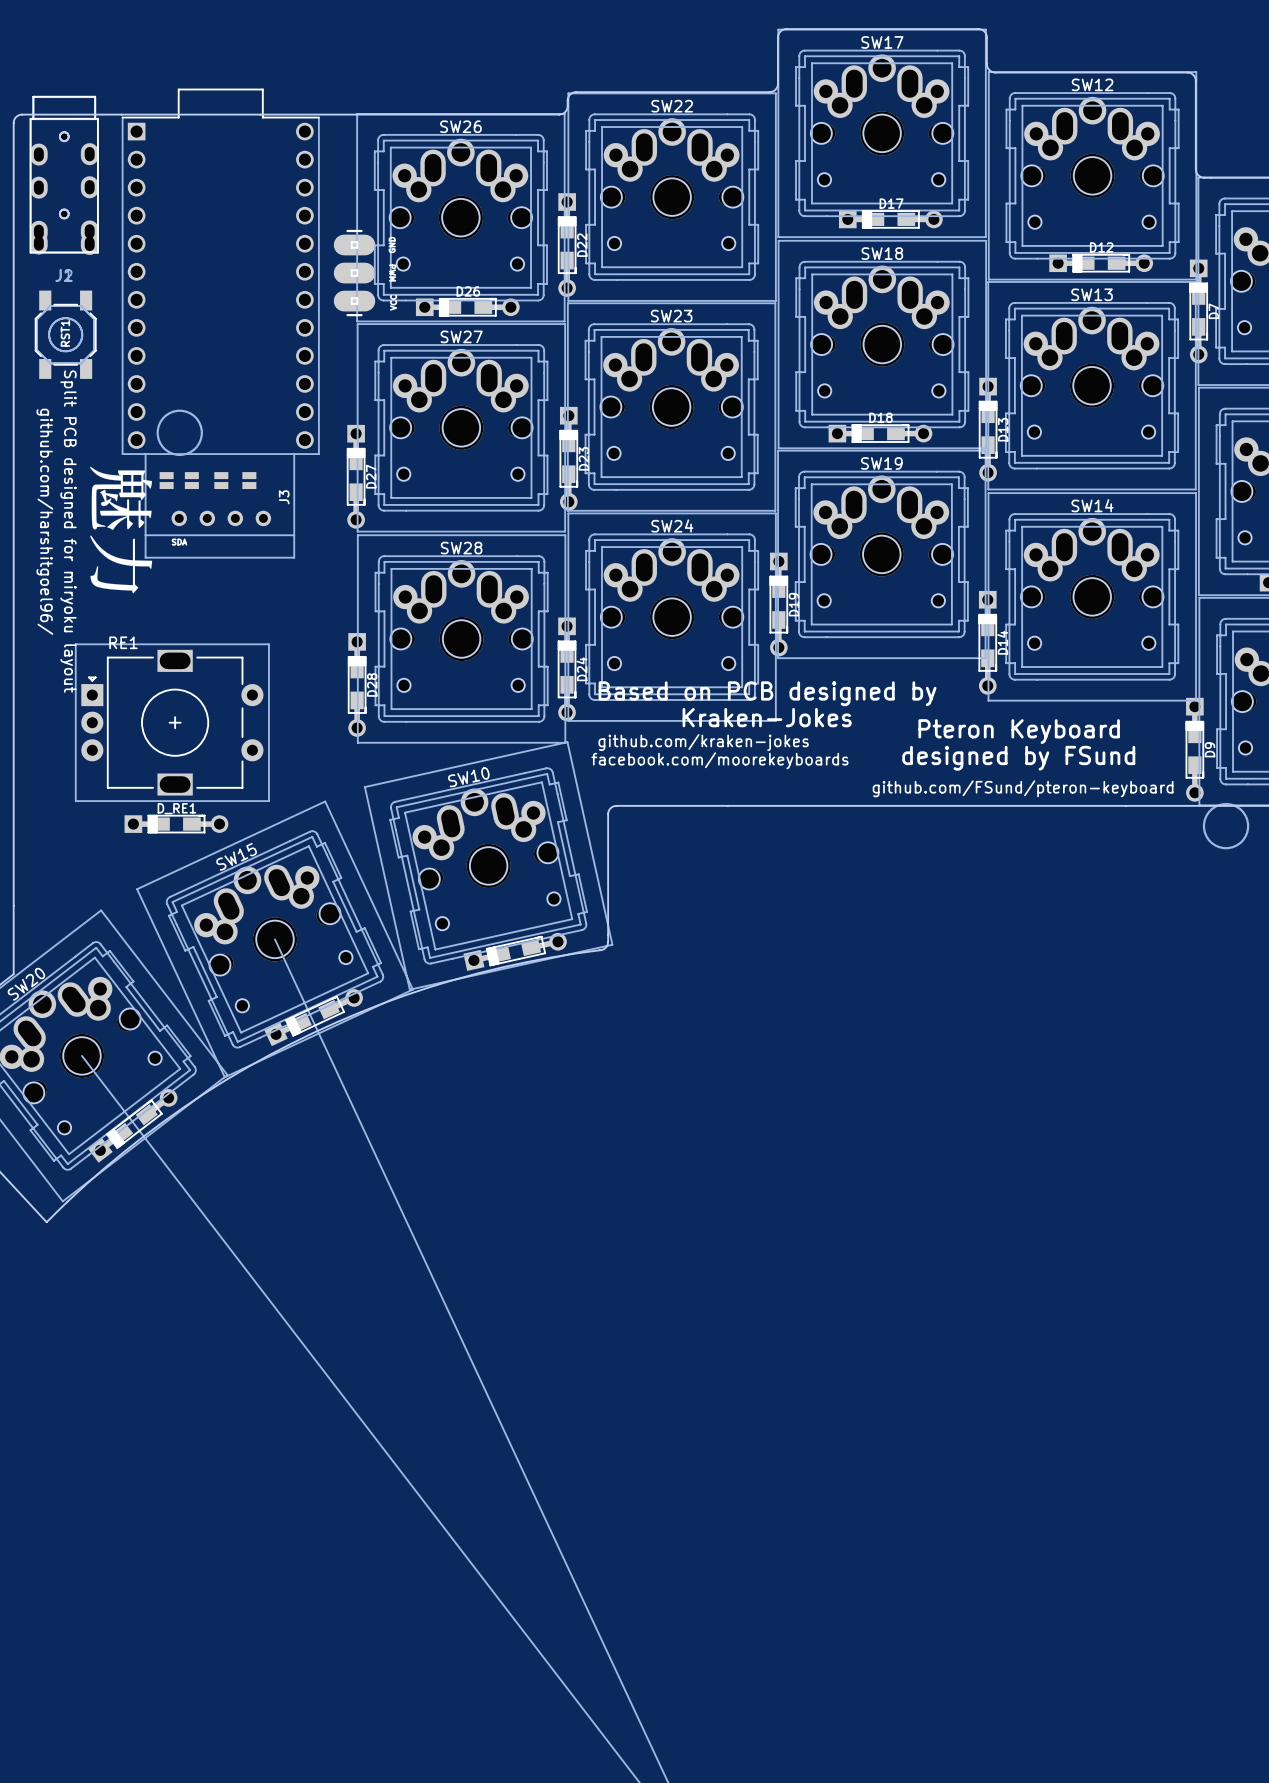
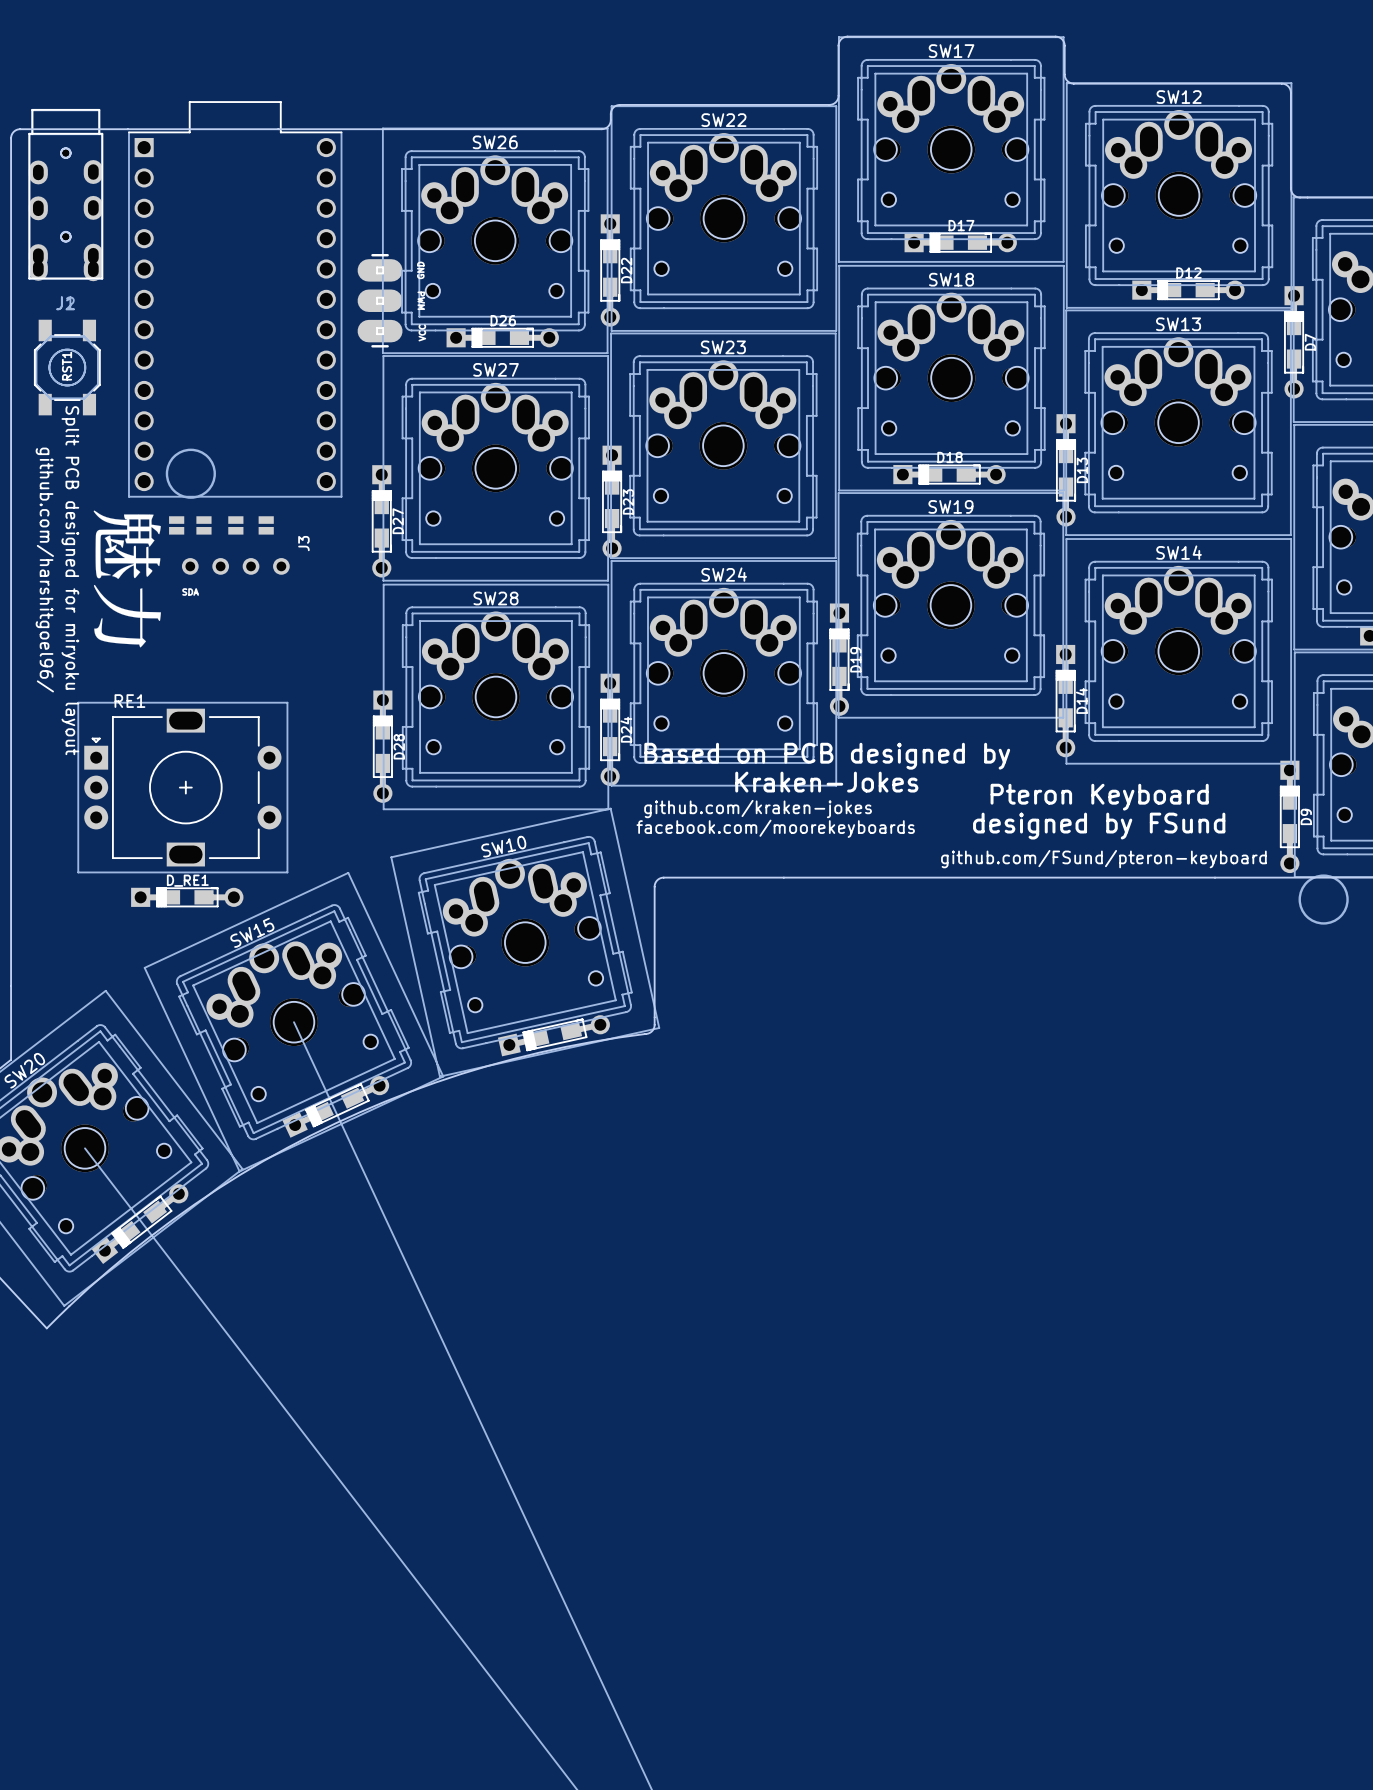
line: (145, 453) (145, 557) (294, 557) (294, 453) -> none
line: (145, 535) (294, 535) -> none

